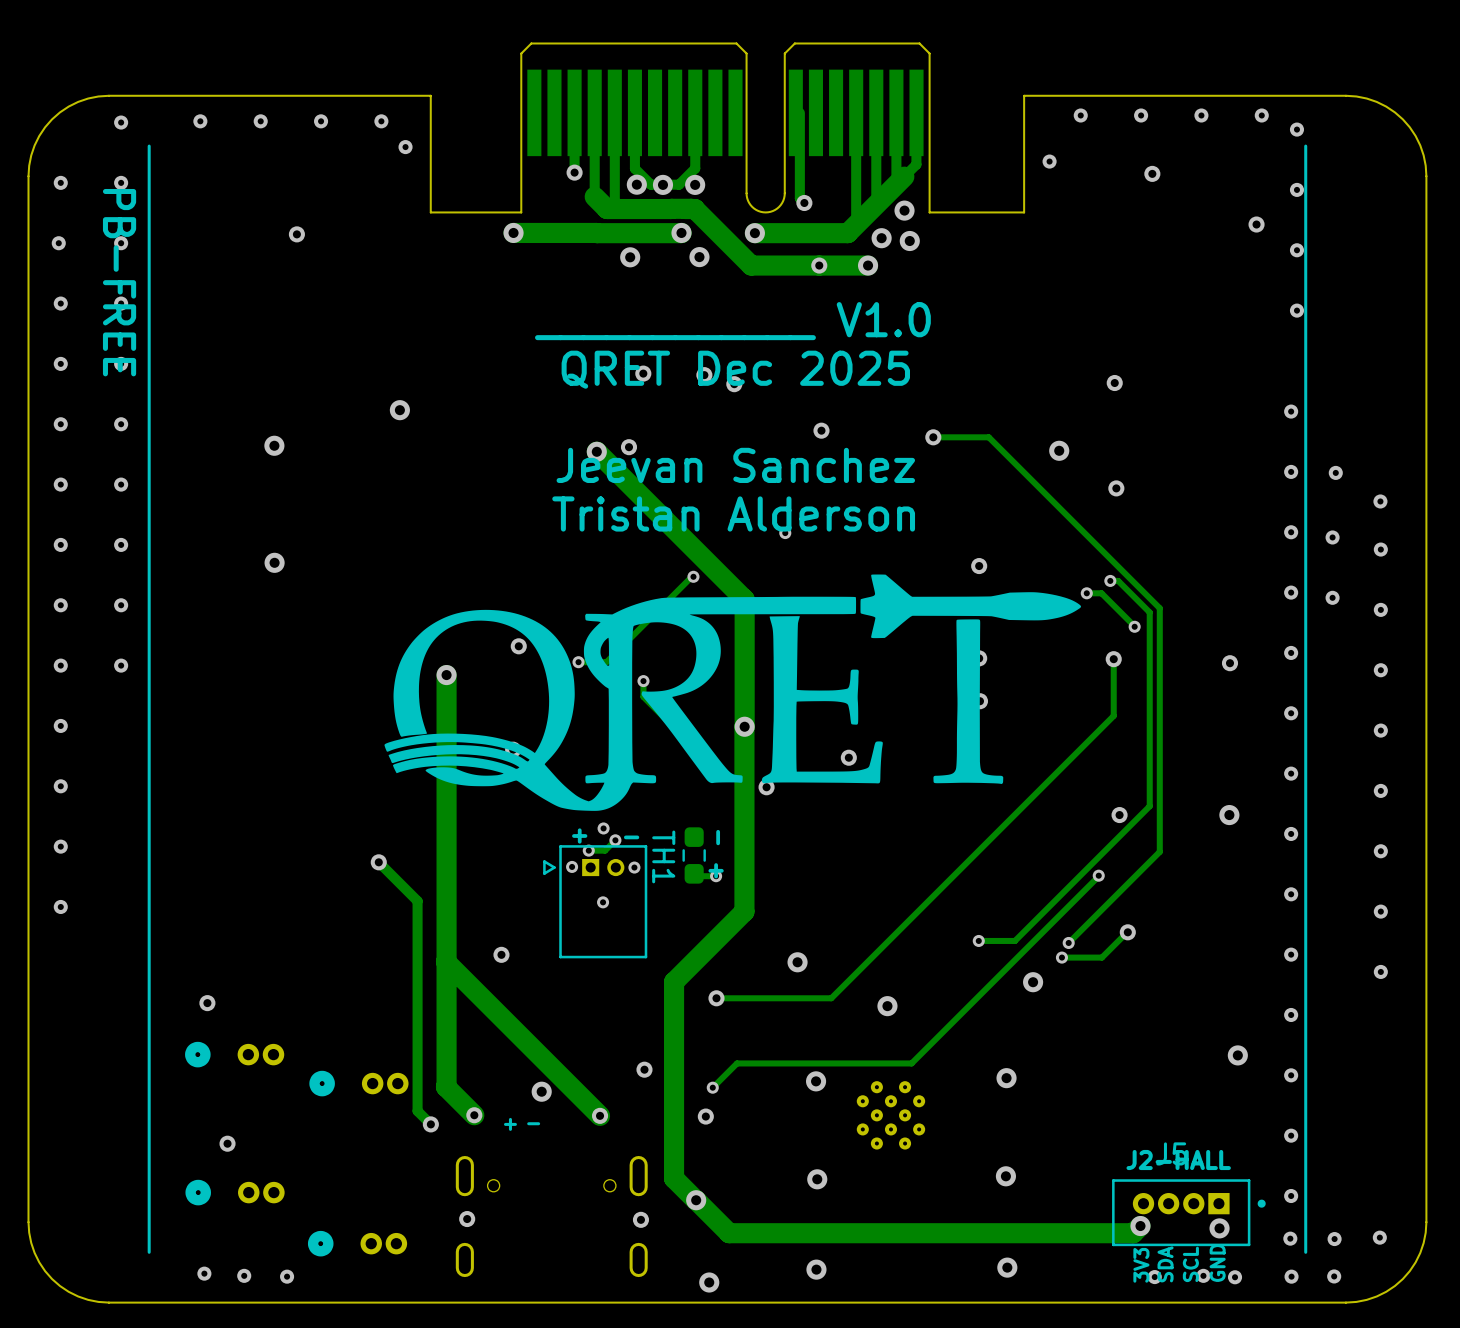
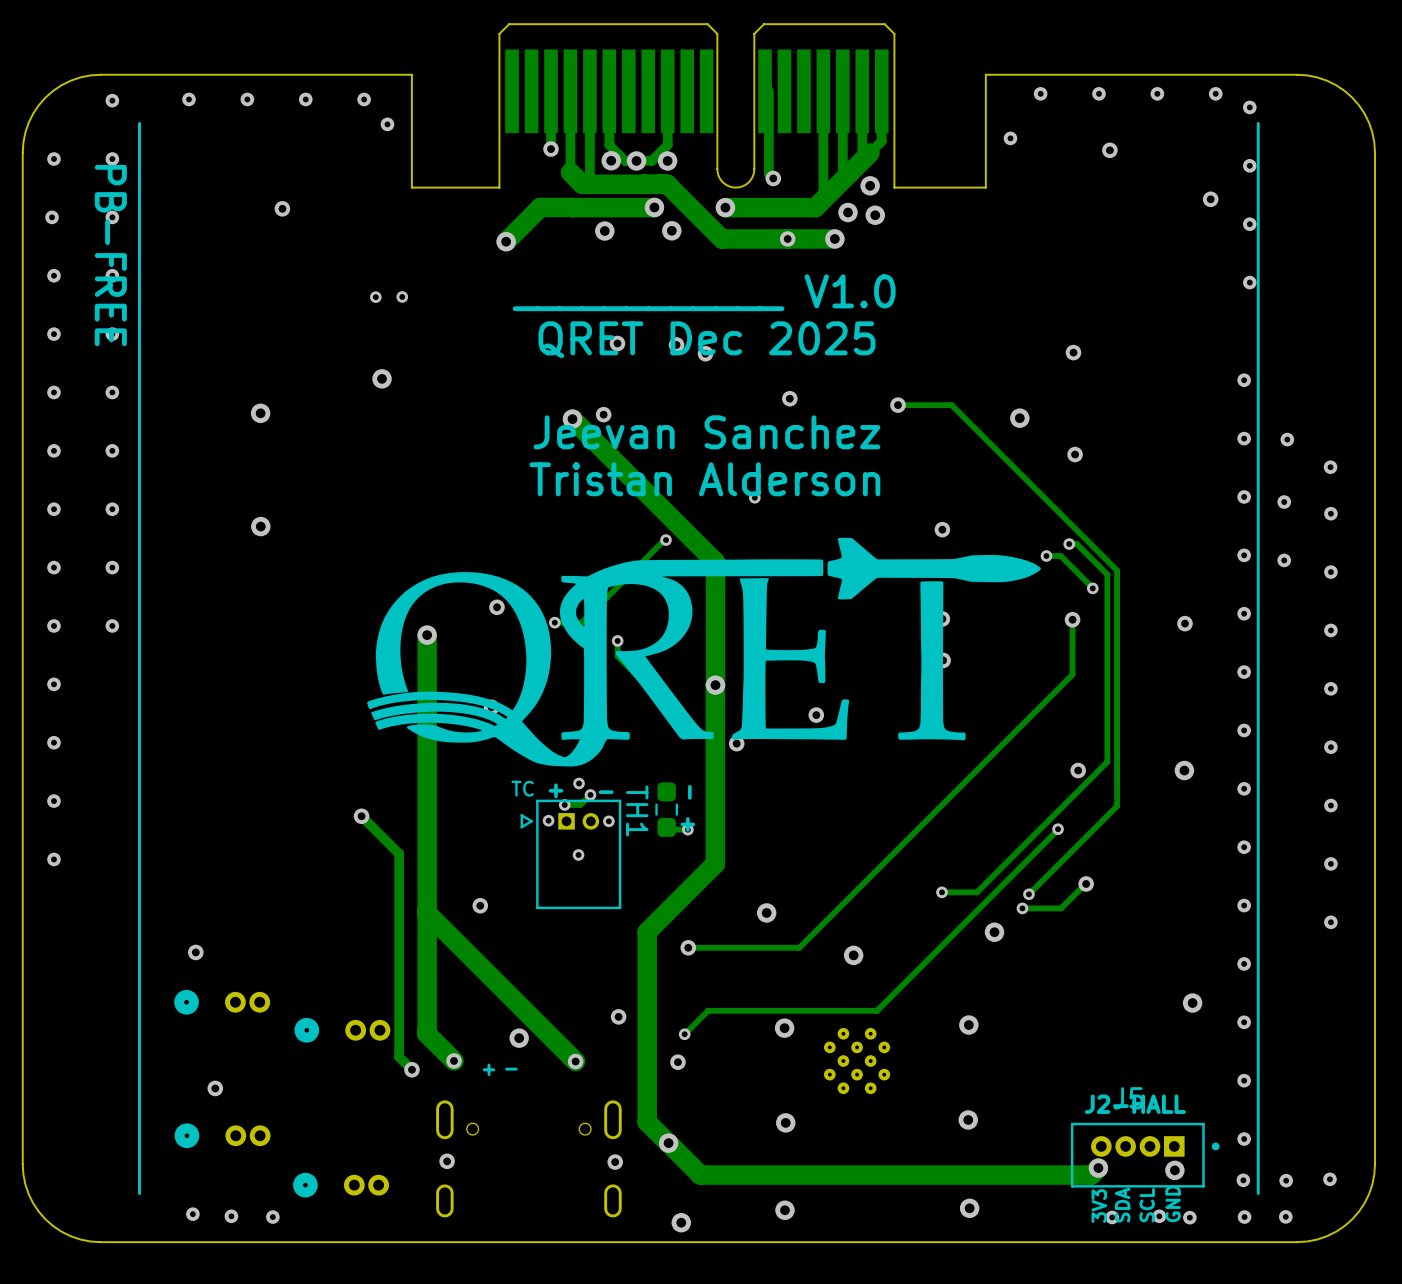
via position: (513, 232) -> (506, 241)
track: (563, 232) (513, 232) -> (540, 207) (506, 241)
via: none -> (375, 297)
via: none -> (402, 296)
text: none -> TC (522, 788)

